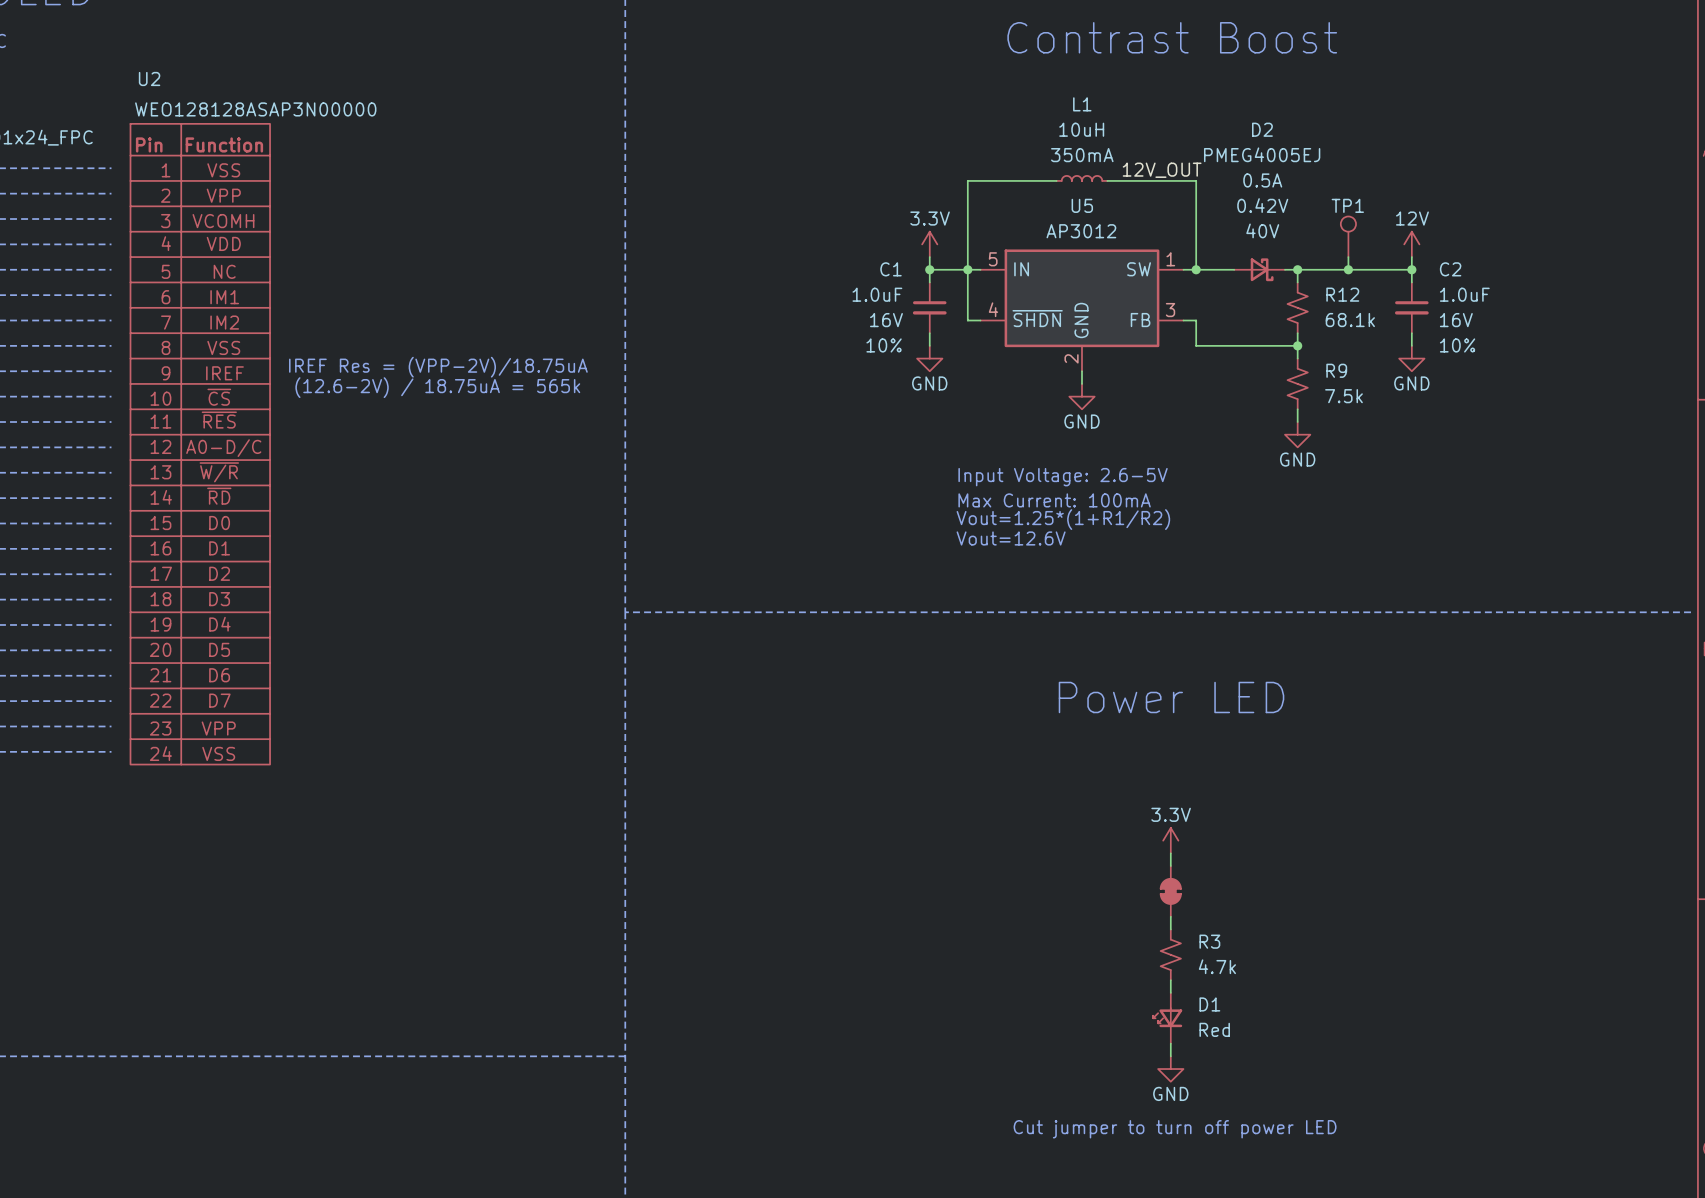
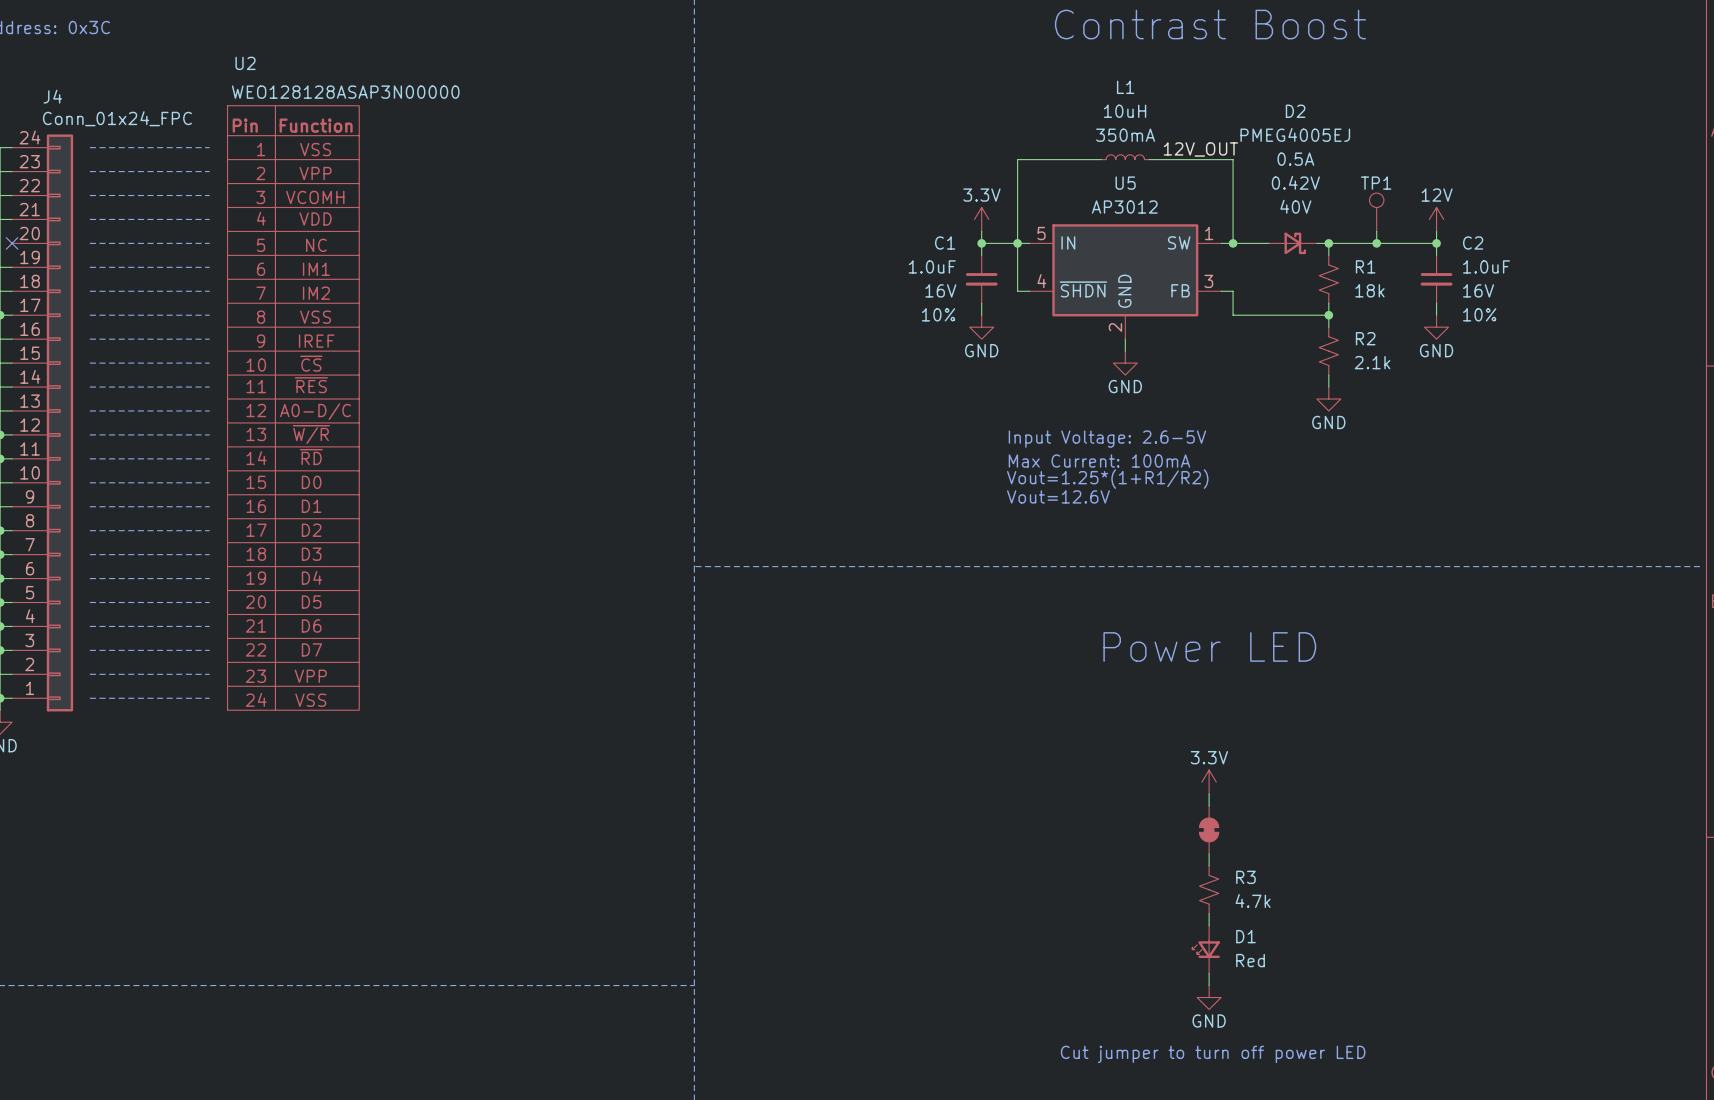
R12 name: R12 (1342, 294) -> R1 (1365, 266)
R12 value: 68.1k (1350, 320) -> 18k (1369, 290)
text: IREF Res = (VPP-2V)/18.75uA (438, 367) -> none
R9 name: R9 (1336, 370) -> R2 (1365, 338)
text: (12.6-2V) / 18.75uA = 565k (437, 387) -> none
R9 value: 7.5k (1343, 396) -> 2.1k (1372, 362)

